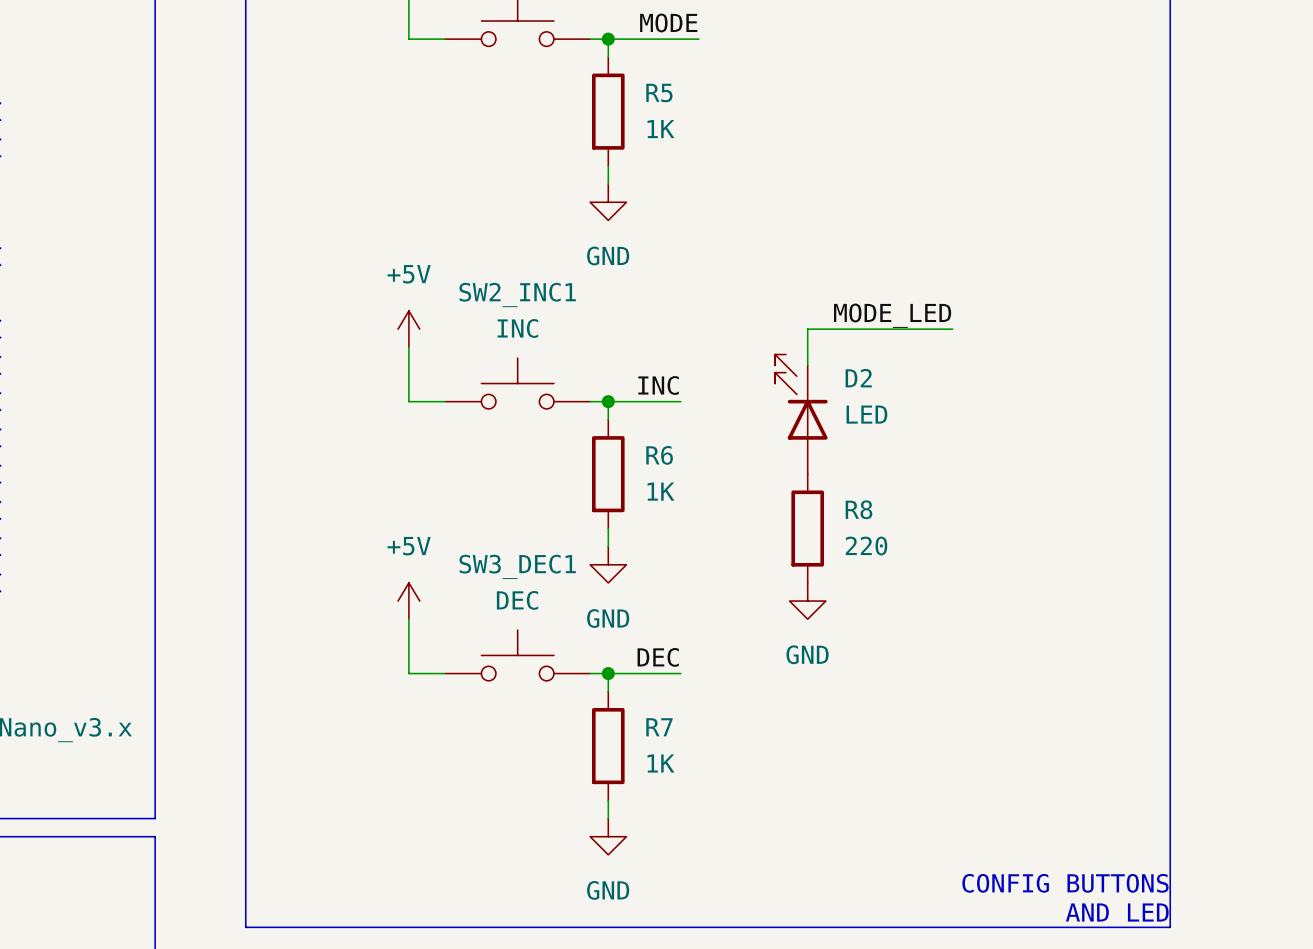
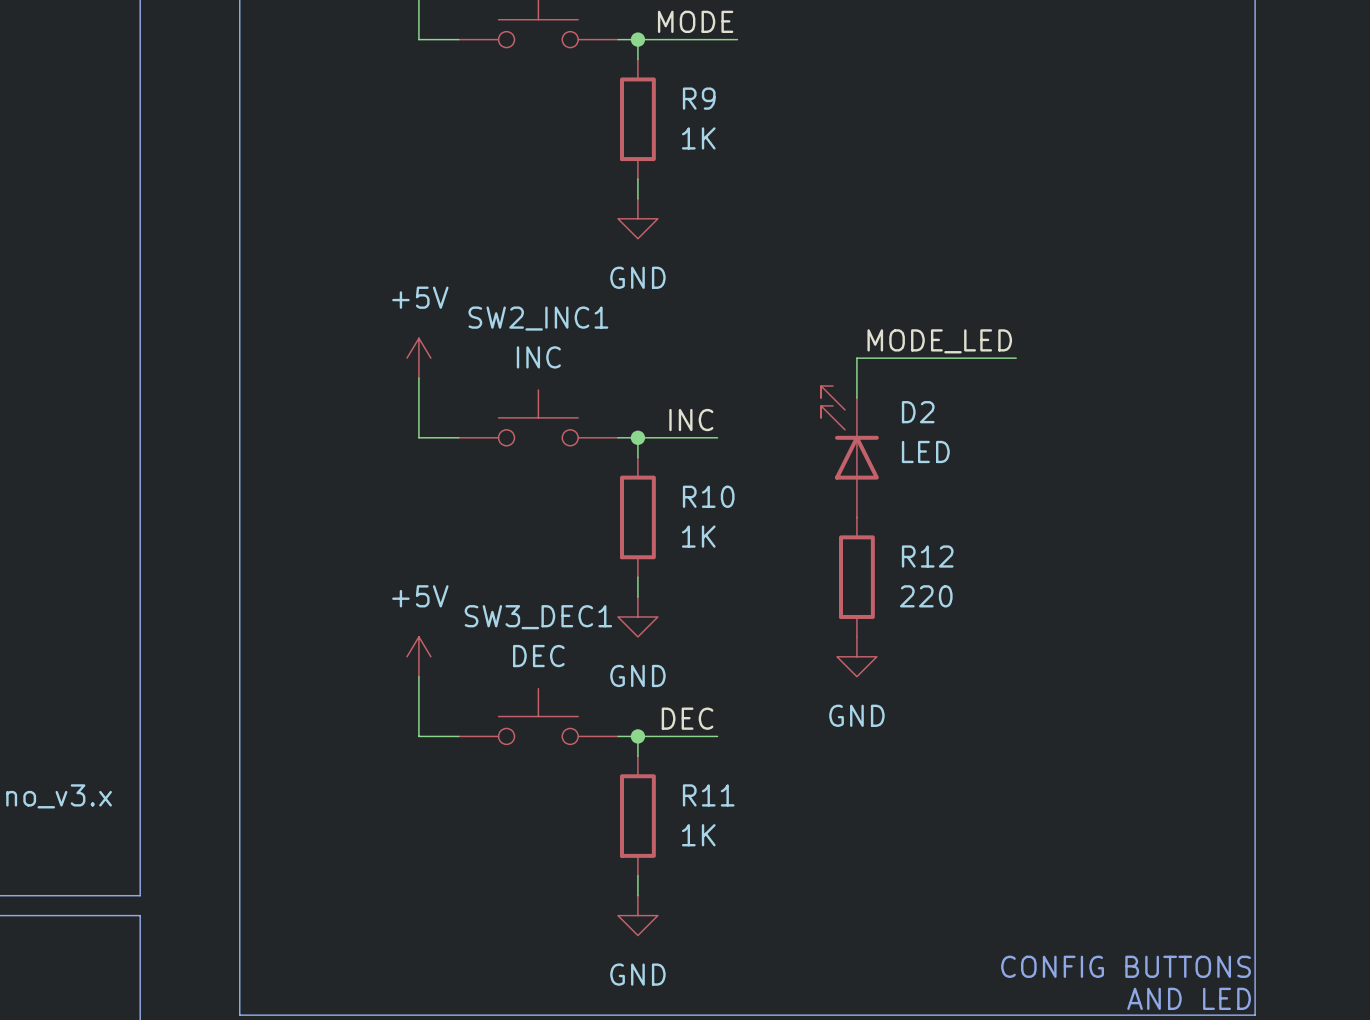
R5 name: R5 (659, 93) -> R9 (699, 98)
R6 name: R6 (659, 455) -> R10 (708, 496)
R8 name: R8 (858, 509) -> R12 (927, 556)
R7 name: R7 (659, 727) -> R11 (708, 795)

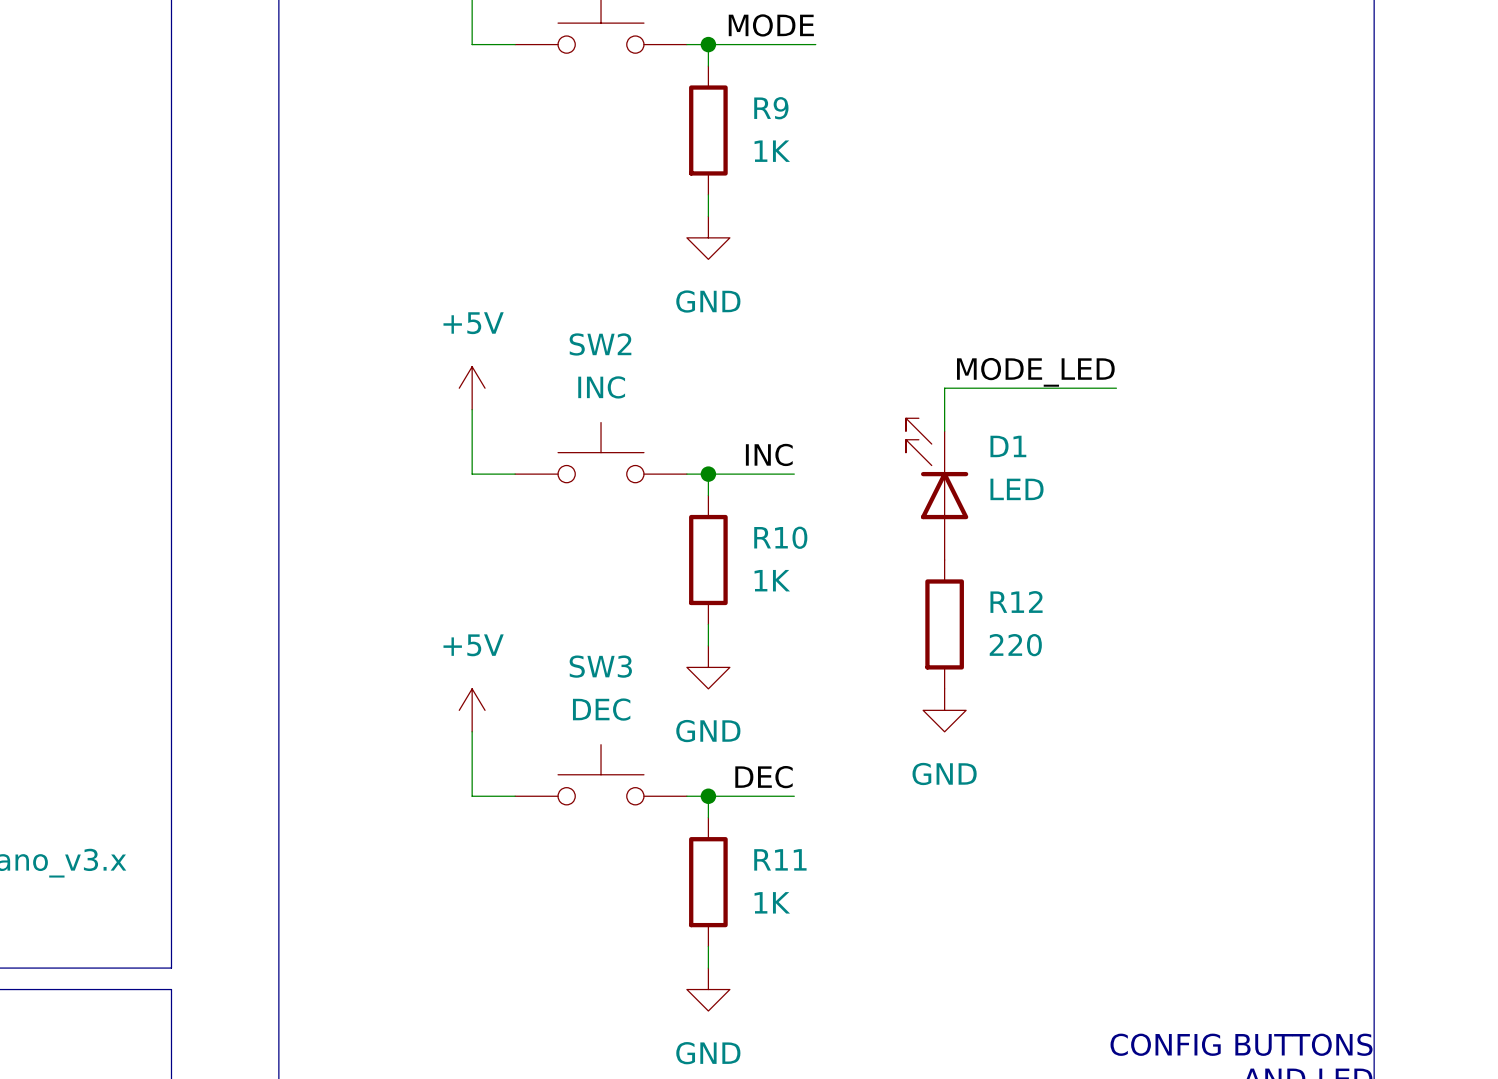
SW2_INC1 name: SW2_INC1 (538, 318) -> SW2 (600, 344)
D2 name: D2 (918, 412) -> D1 (1008, 446)
SW3_DEC1 name: SW3_DEC1 (538, 617) -> SW3 (600, 666)

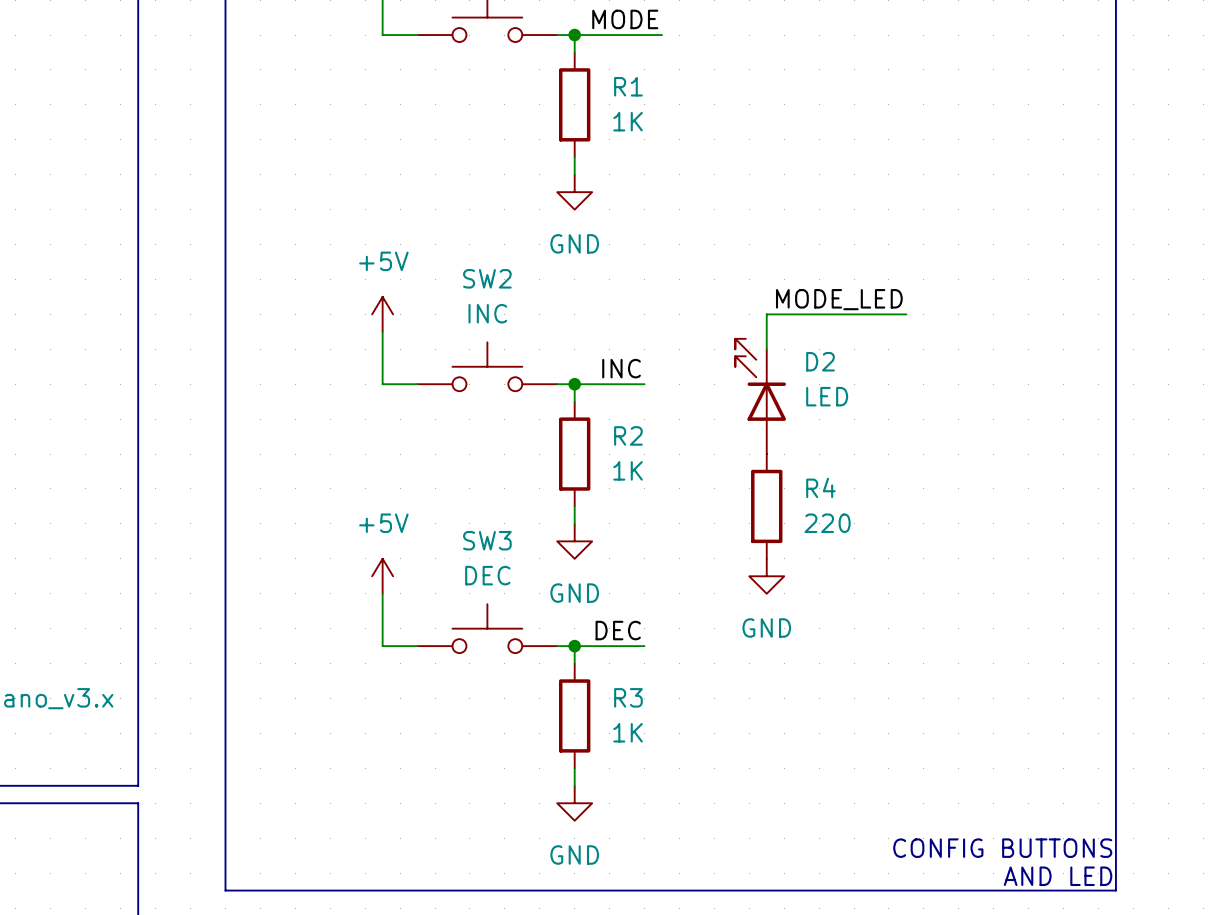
R9 name: R9 (771, 108) -> R1 (628, 86)
D1 name: D1 (1008, 446) -> D2 (820, 361)
R10 name: R10 (780, 537) -> R2 (628, 435)
R12 name: R12 (1016, 601) -> R4 (820, 487)
R11 name: R11 (780, 859) -> R3 (628, 697)

